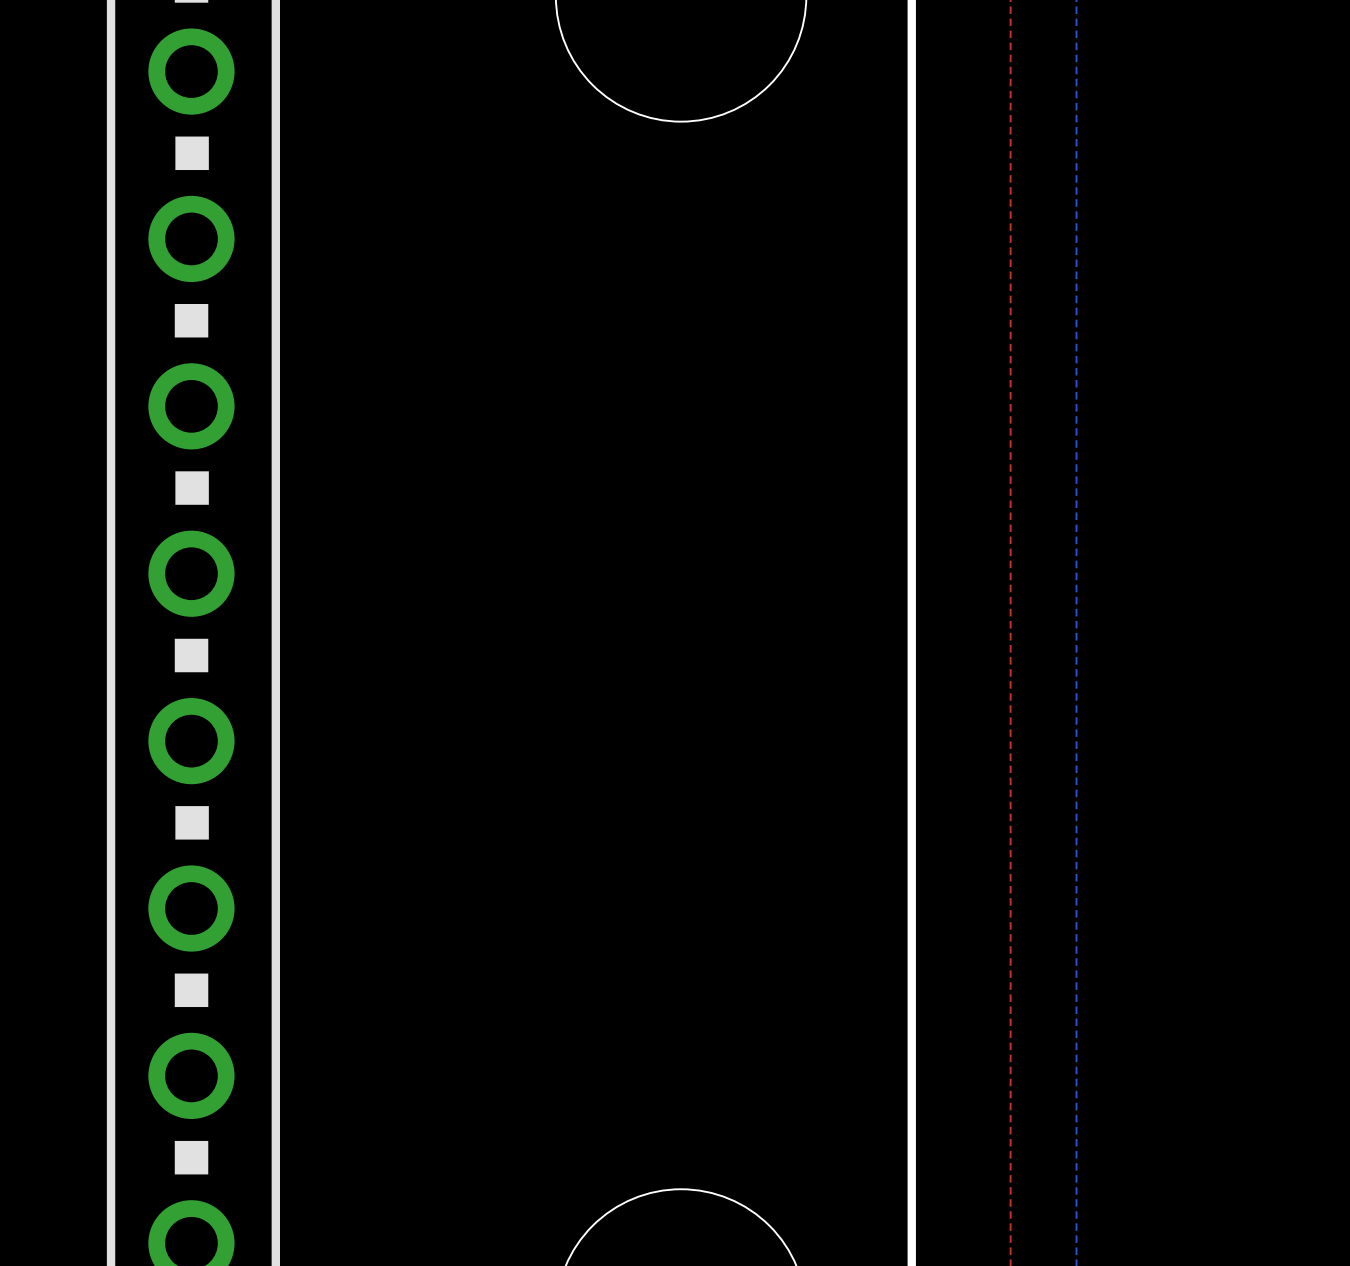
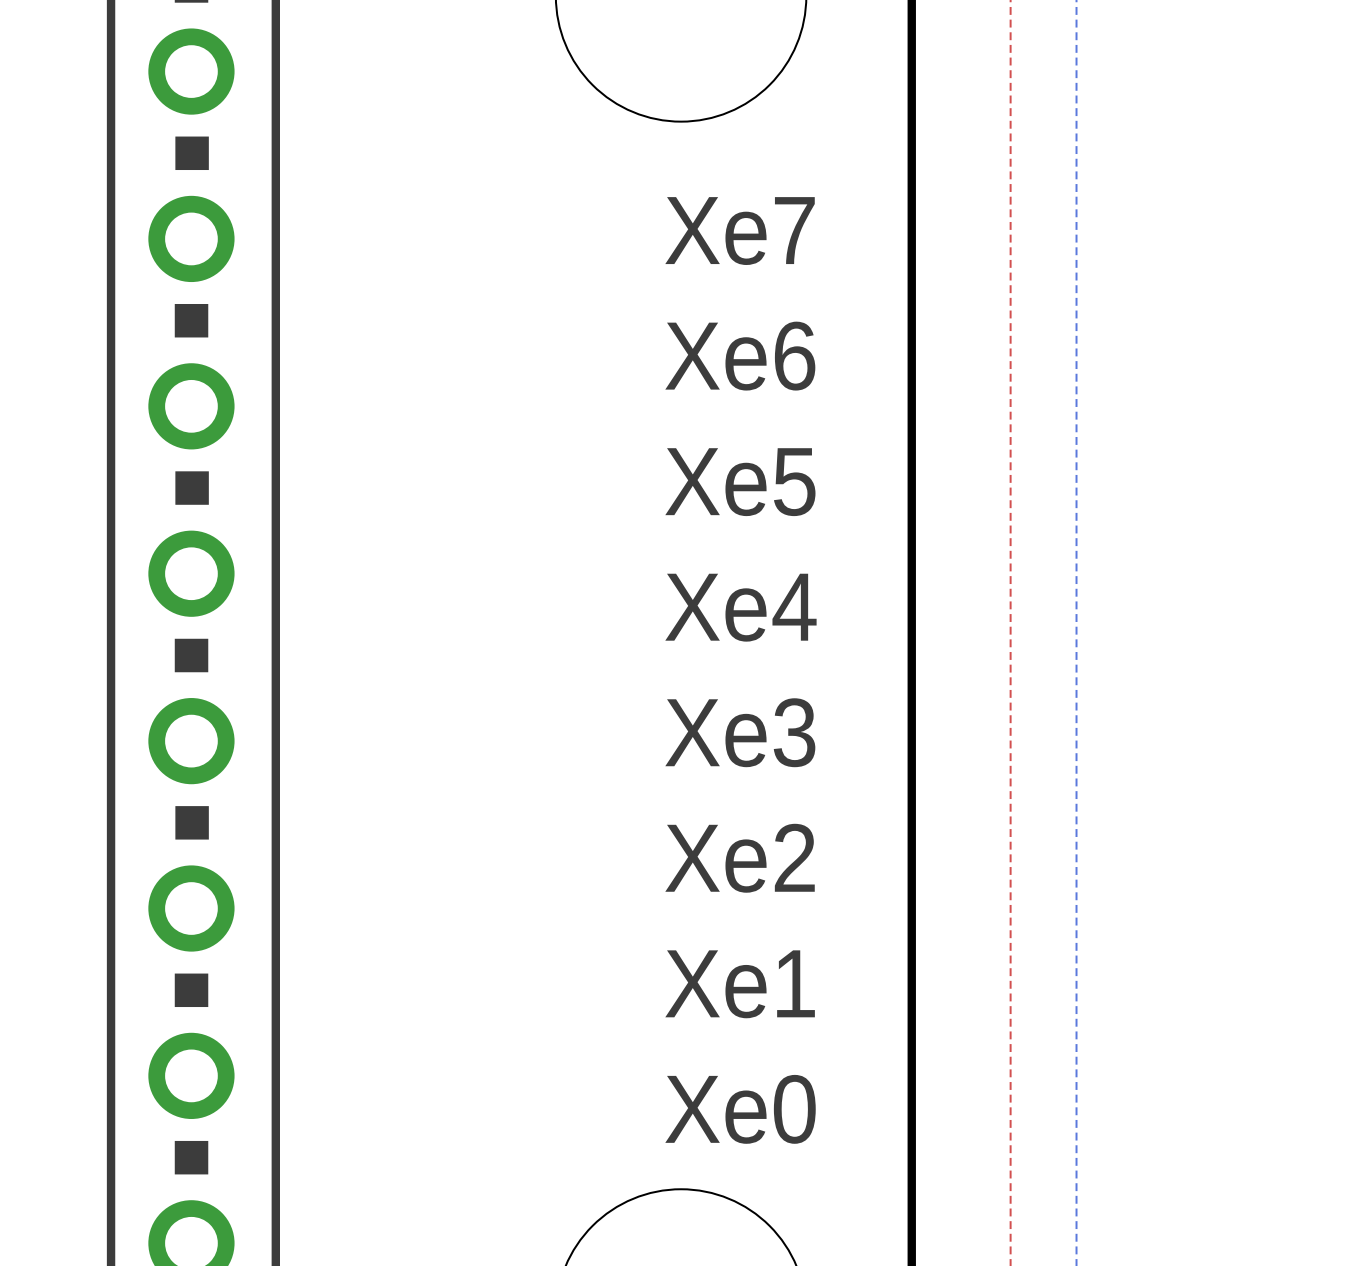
text: none -> Xe7 (740, 231)
text: none -> Xe6 (740, 356)
text: none -> Xe5 (740, 482)
text: none -> Xe4 (740, 607)
text: none -> Xe3 (740, 732)
text: none -> Xe2 (740, 858)
text: none -> Xe1 (740, 984)
text: none -> Xe0 (740, 1109)

